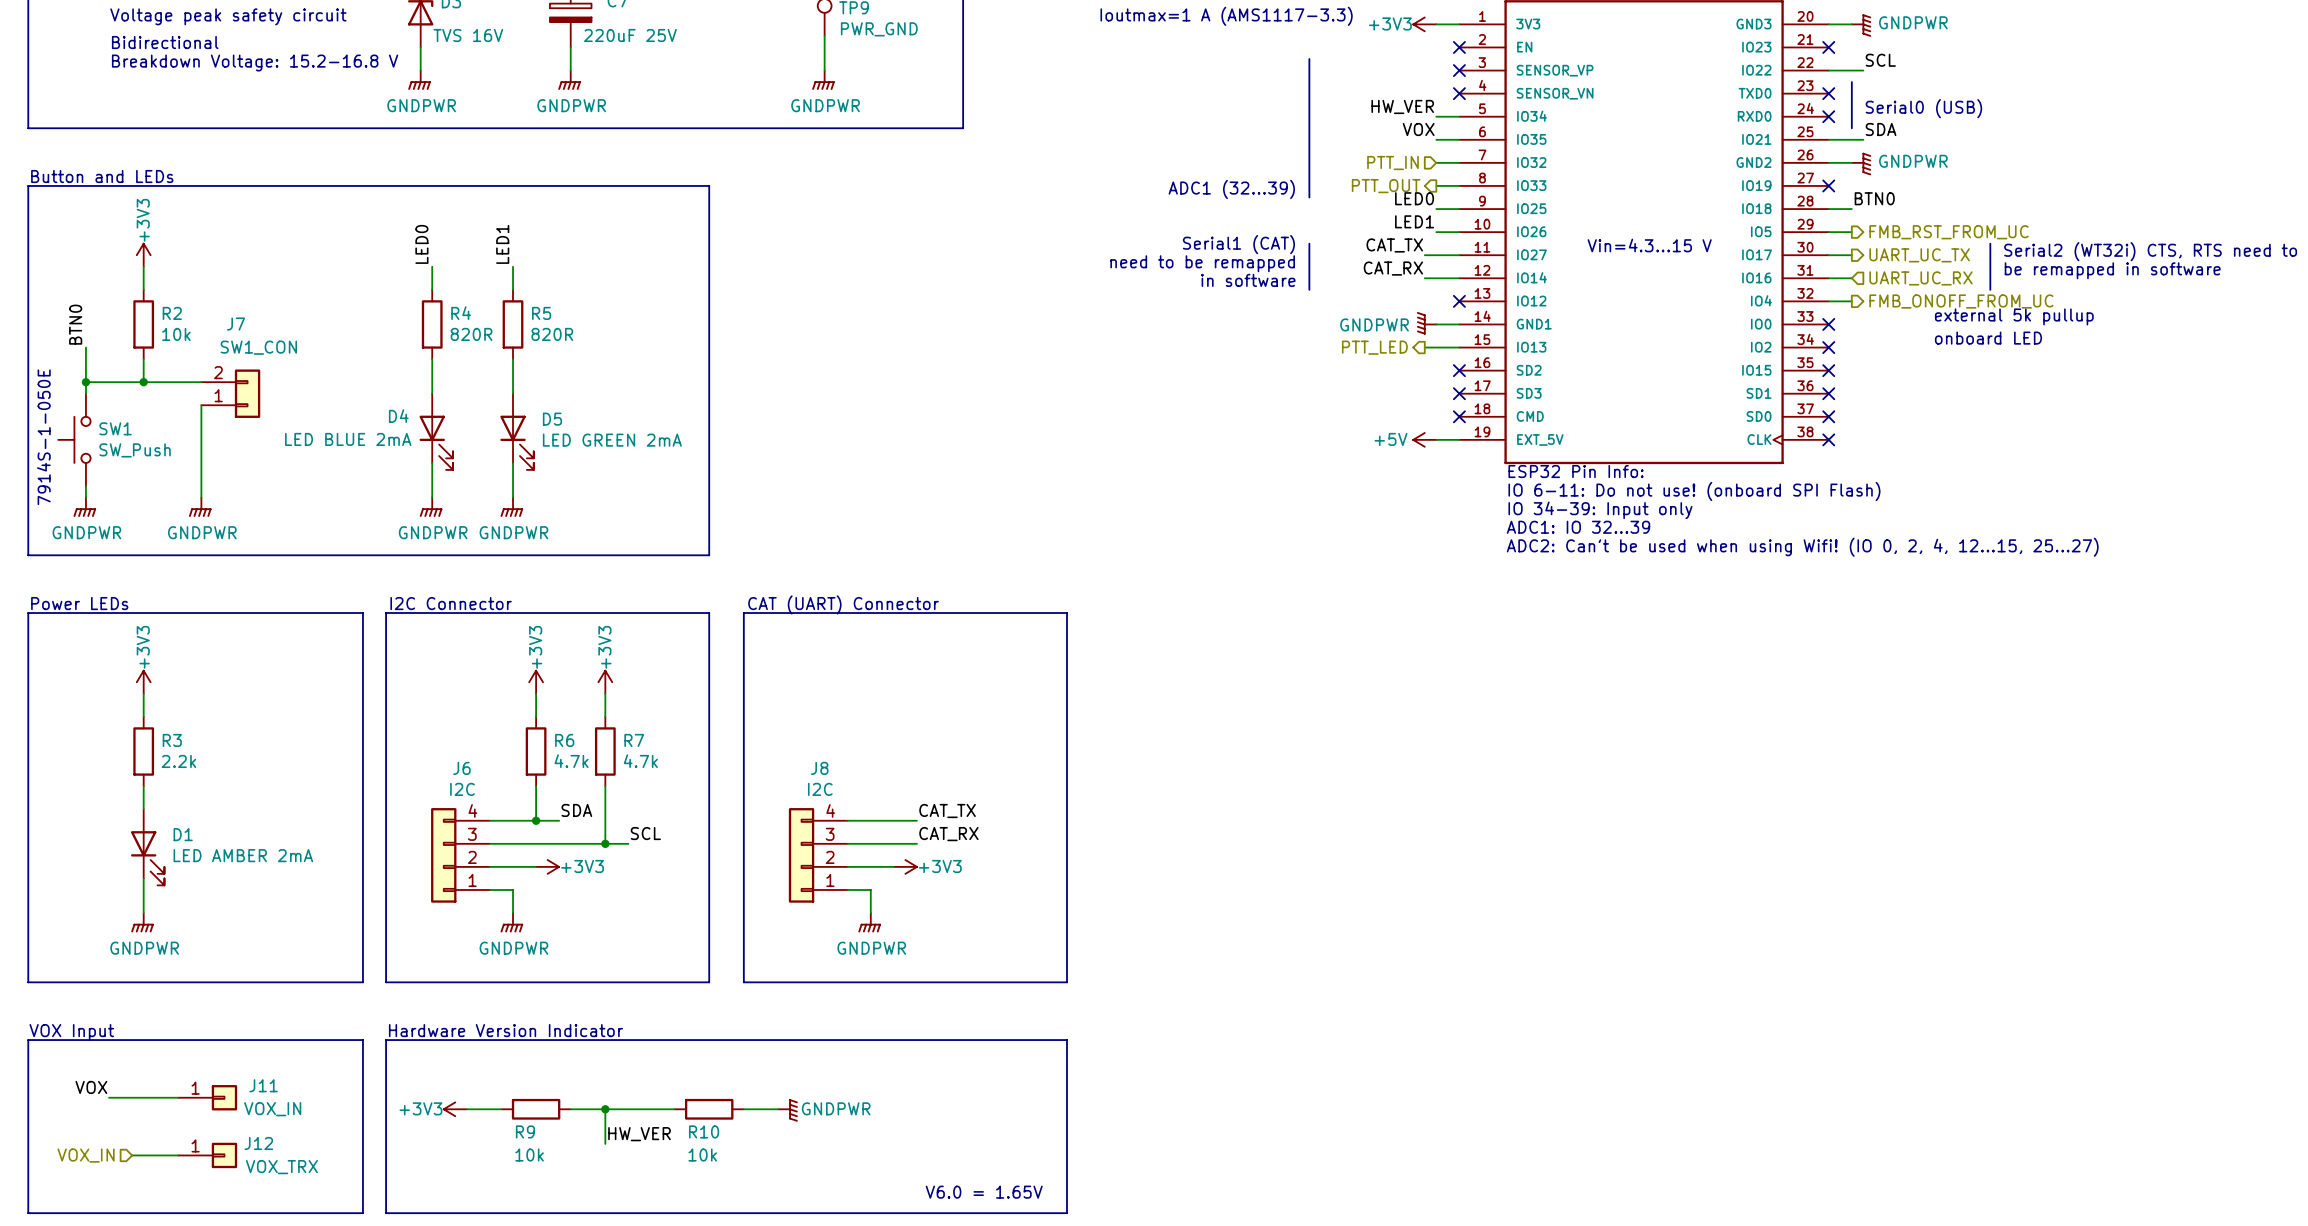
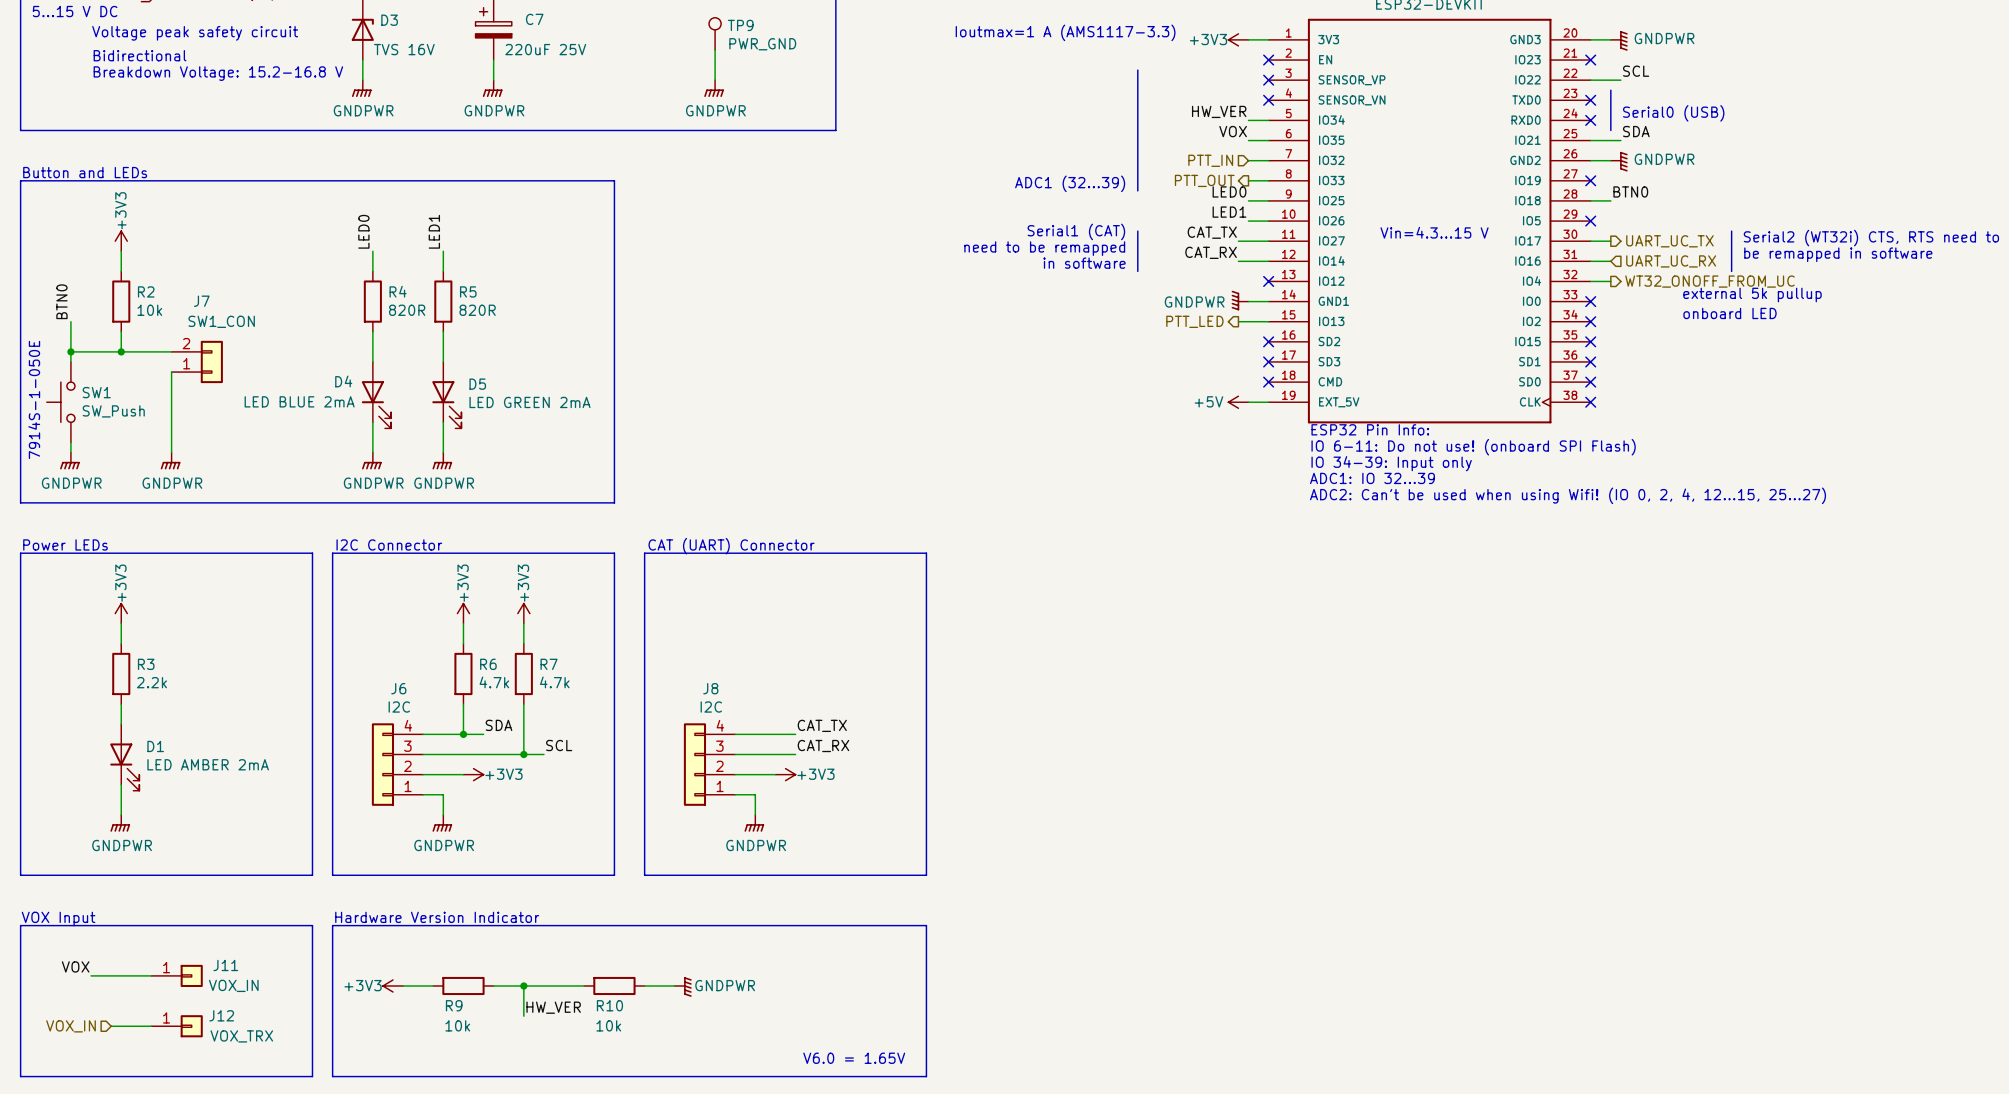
wire: (1828, 232) (1851, 232) -> none
no-connect mark: none -> (1590, 221)
hierarchical label: FMB_RST_FROM_UC (1949, 232) -> none
hierarchical label: FMB_ONOFF_FROM_UC (1961, 301) -> WT32_ONOFF_FROM_UC (1709, 281)

